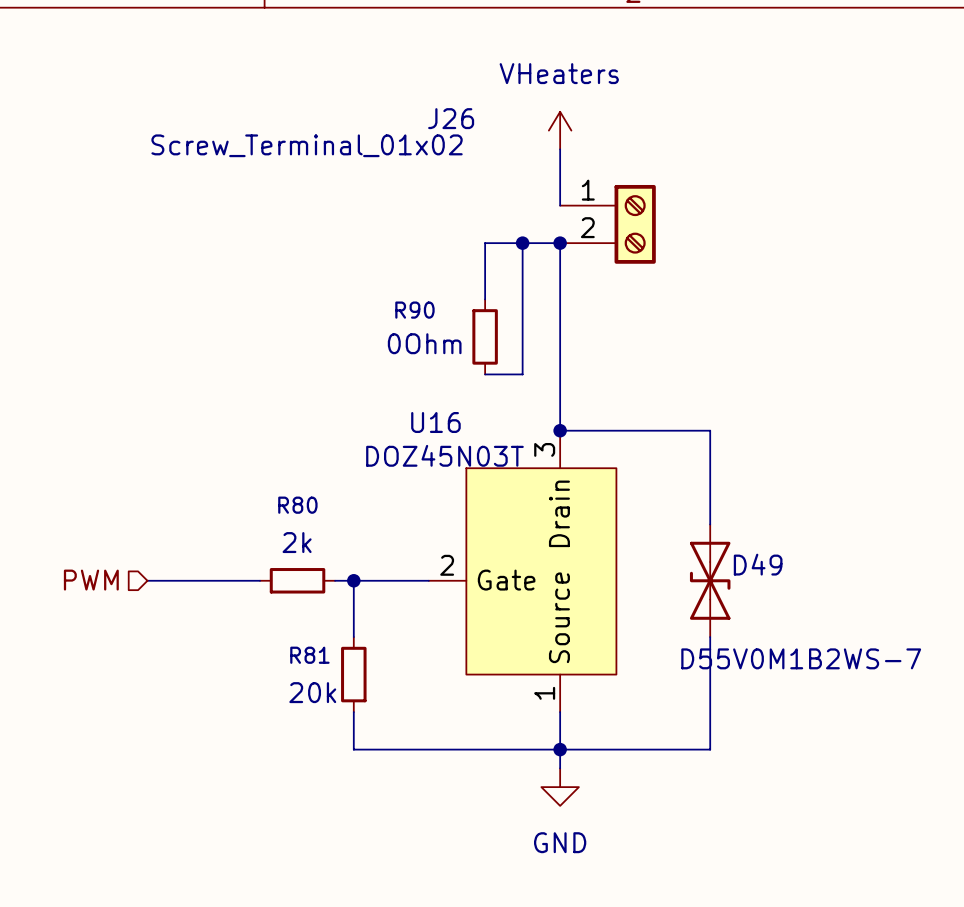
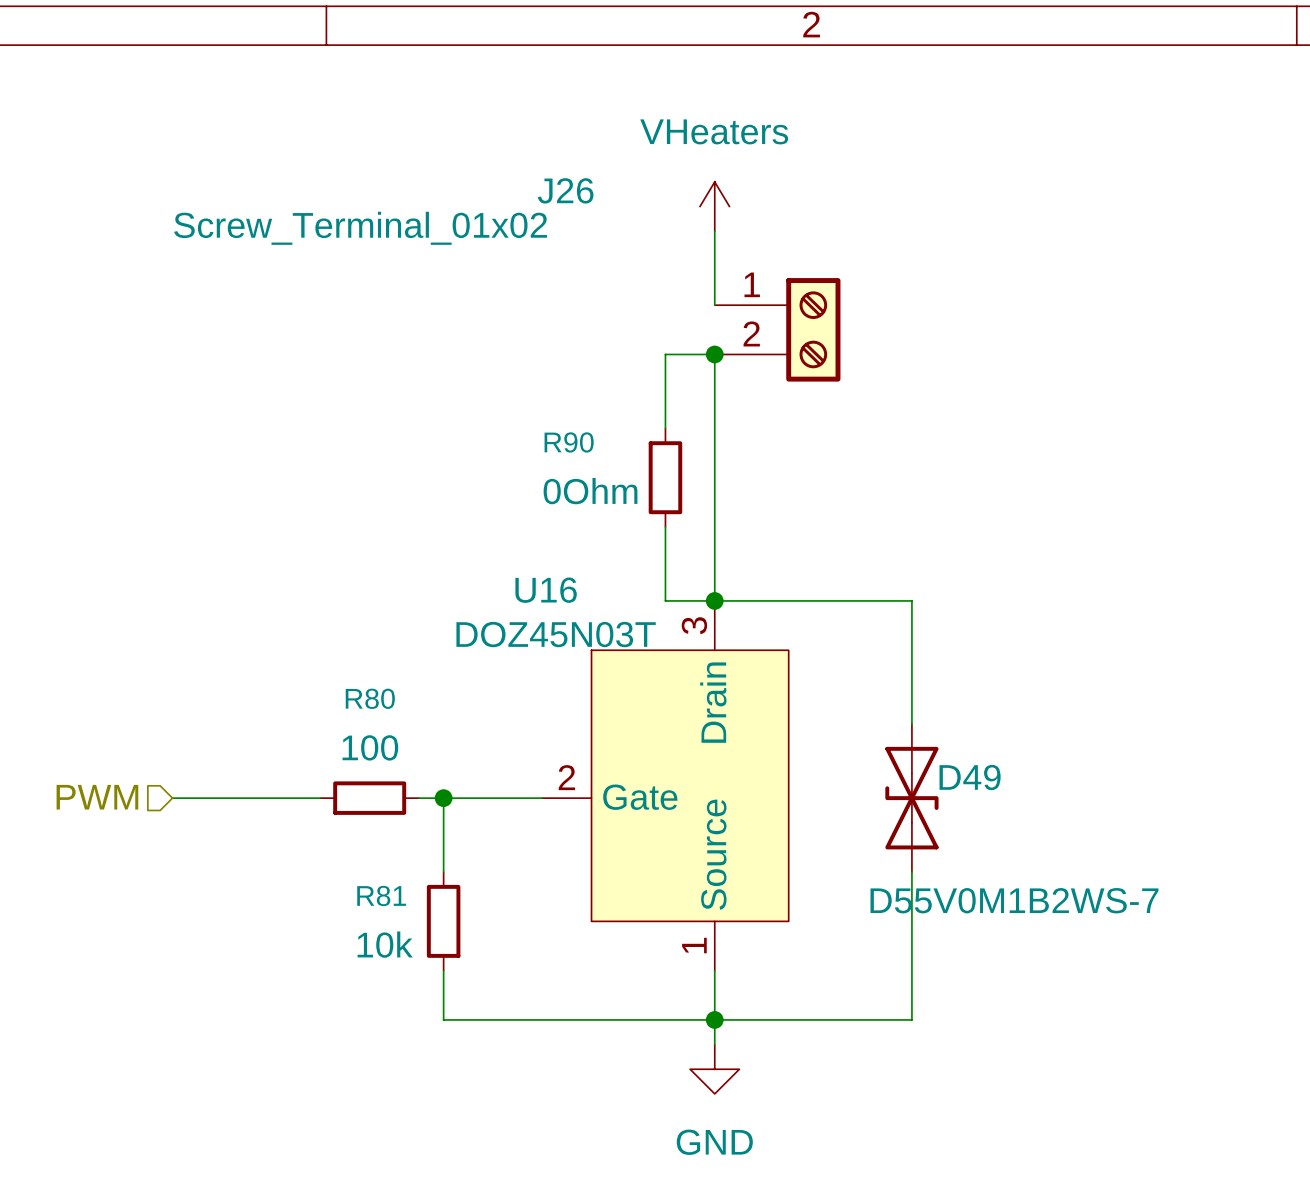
wire: (522, 243) (485, 243) (485, 299) -> none
junction: (522, 243) -> none
wire: (522, 299) (522, 374) (485, 374) -> none
R90 position: (485, 336) -> (665, 477)
R90 value position: 0Ohm (424, 343) -> 0Ohm (590, 491)
wire: none -> (665, 527) (665, 600) (714, 600)
R80 value: 2k (297, 542) -> 100 (370, 747)
R81 value: 20k (312, 692) -> 10k (385, 944)

